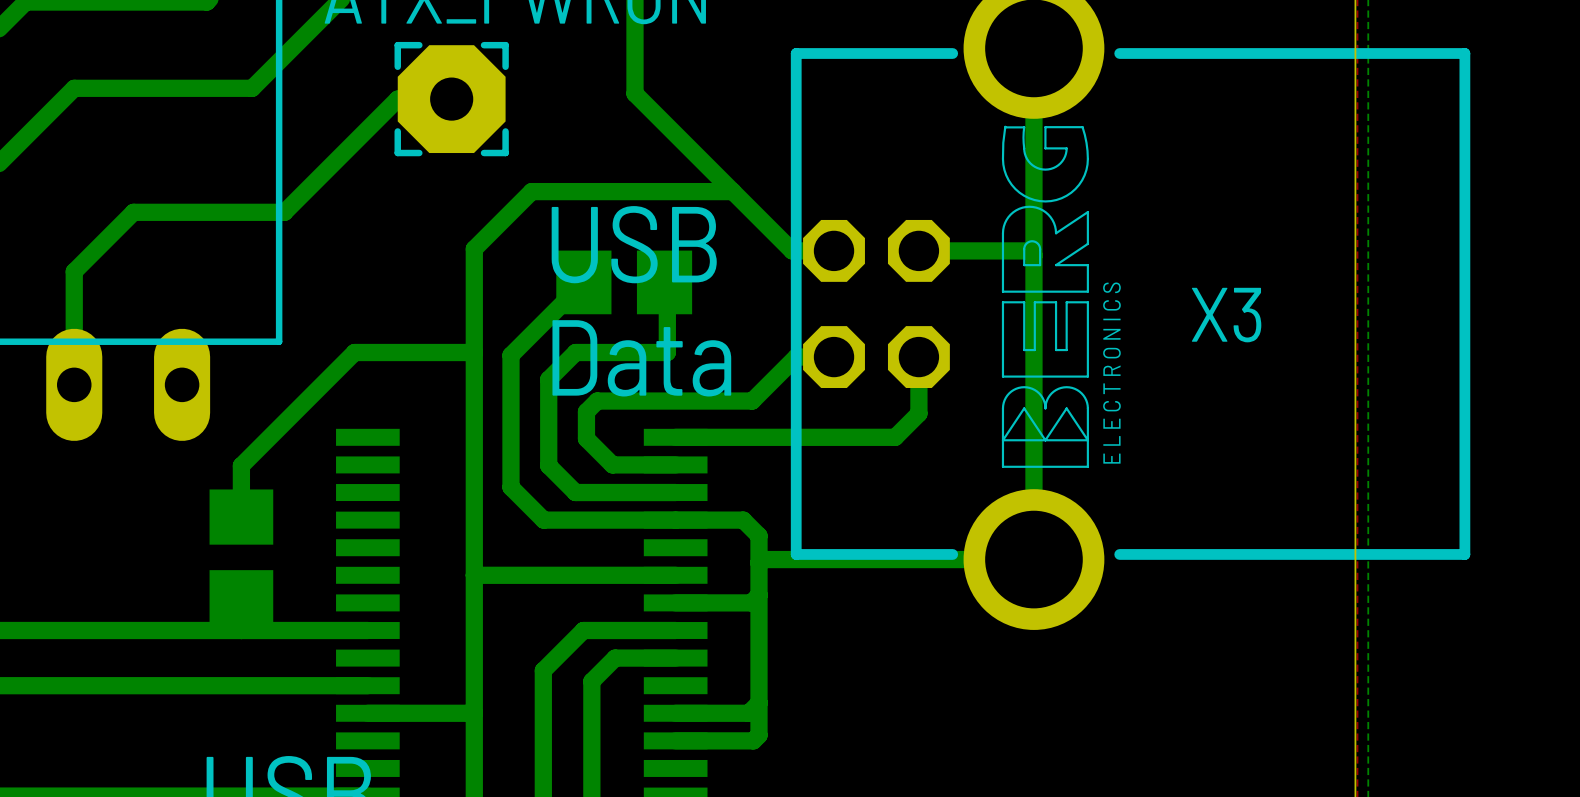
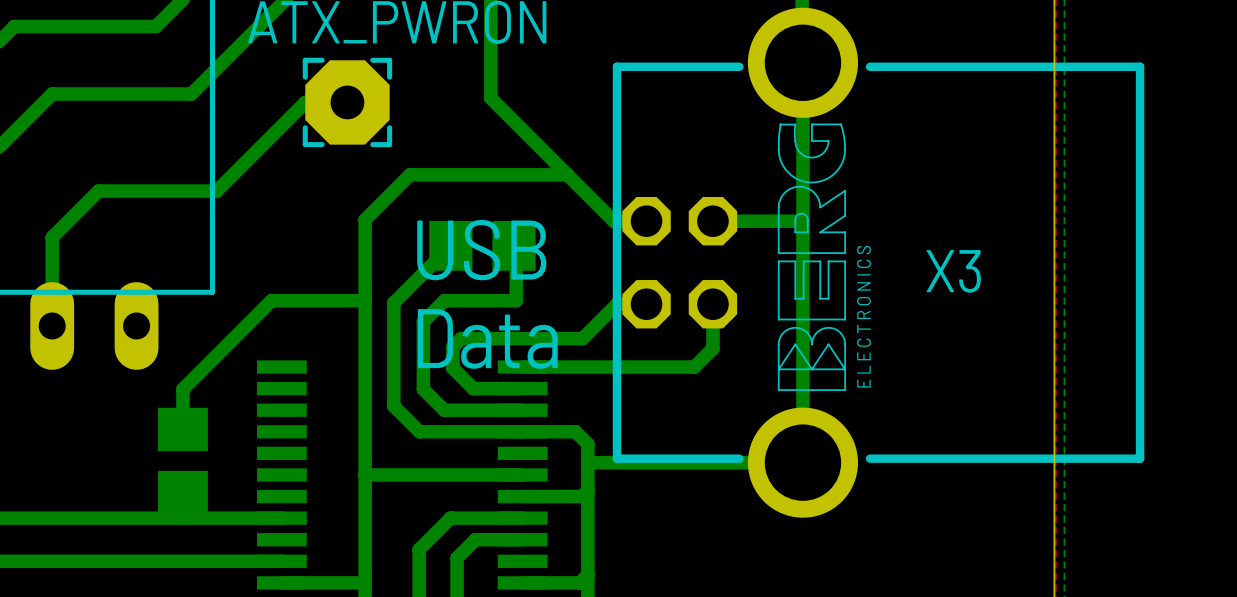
text position: USB (634, 244) -> USB (481, 250)
text position: Data (641, 358) -> Data (487, 338)

